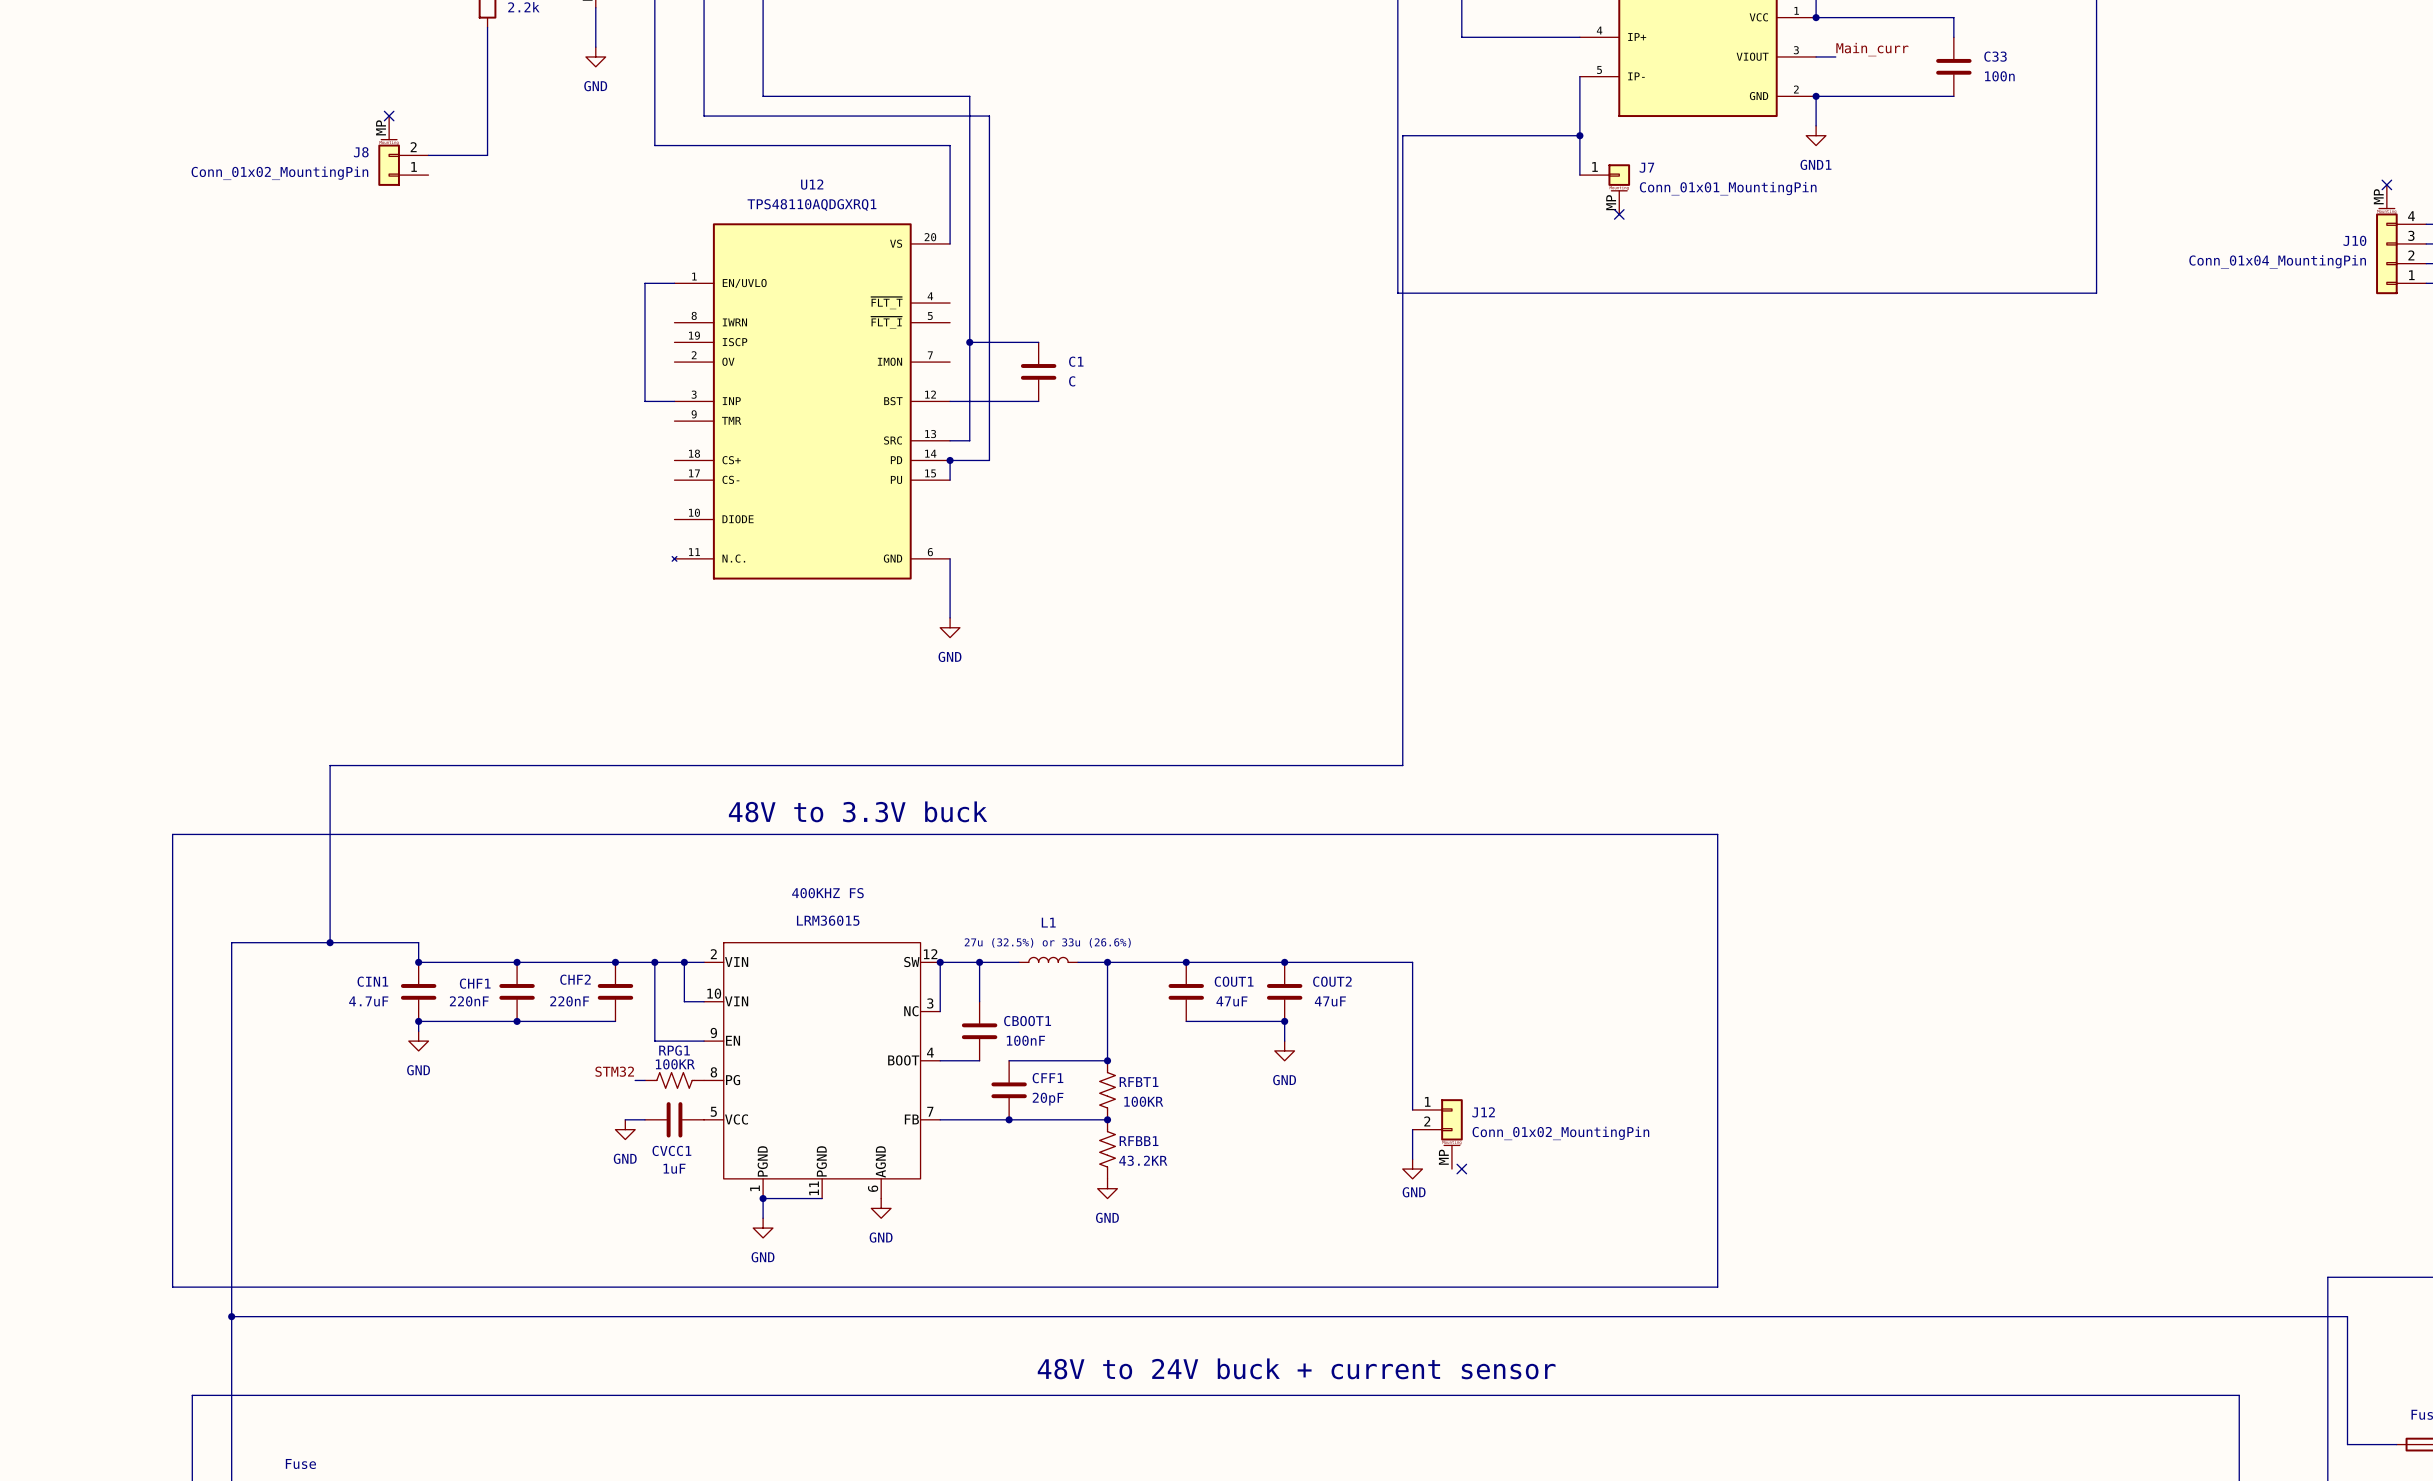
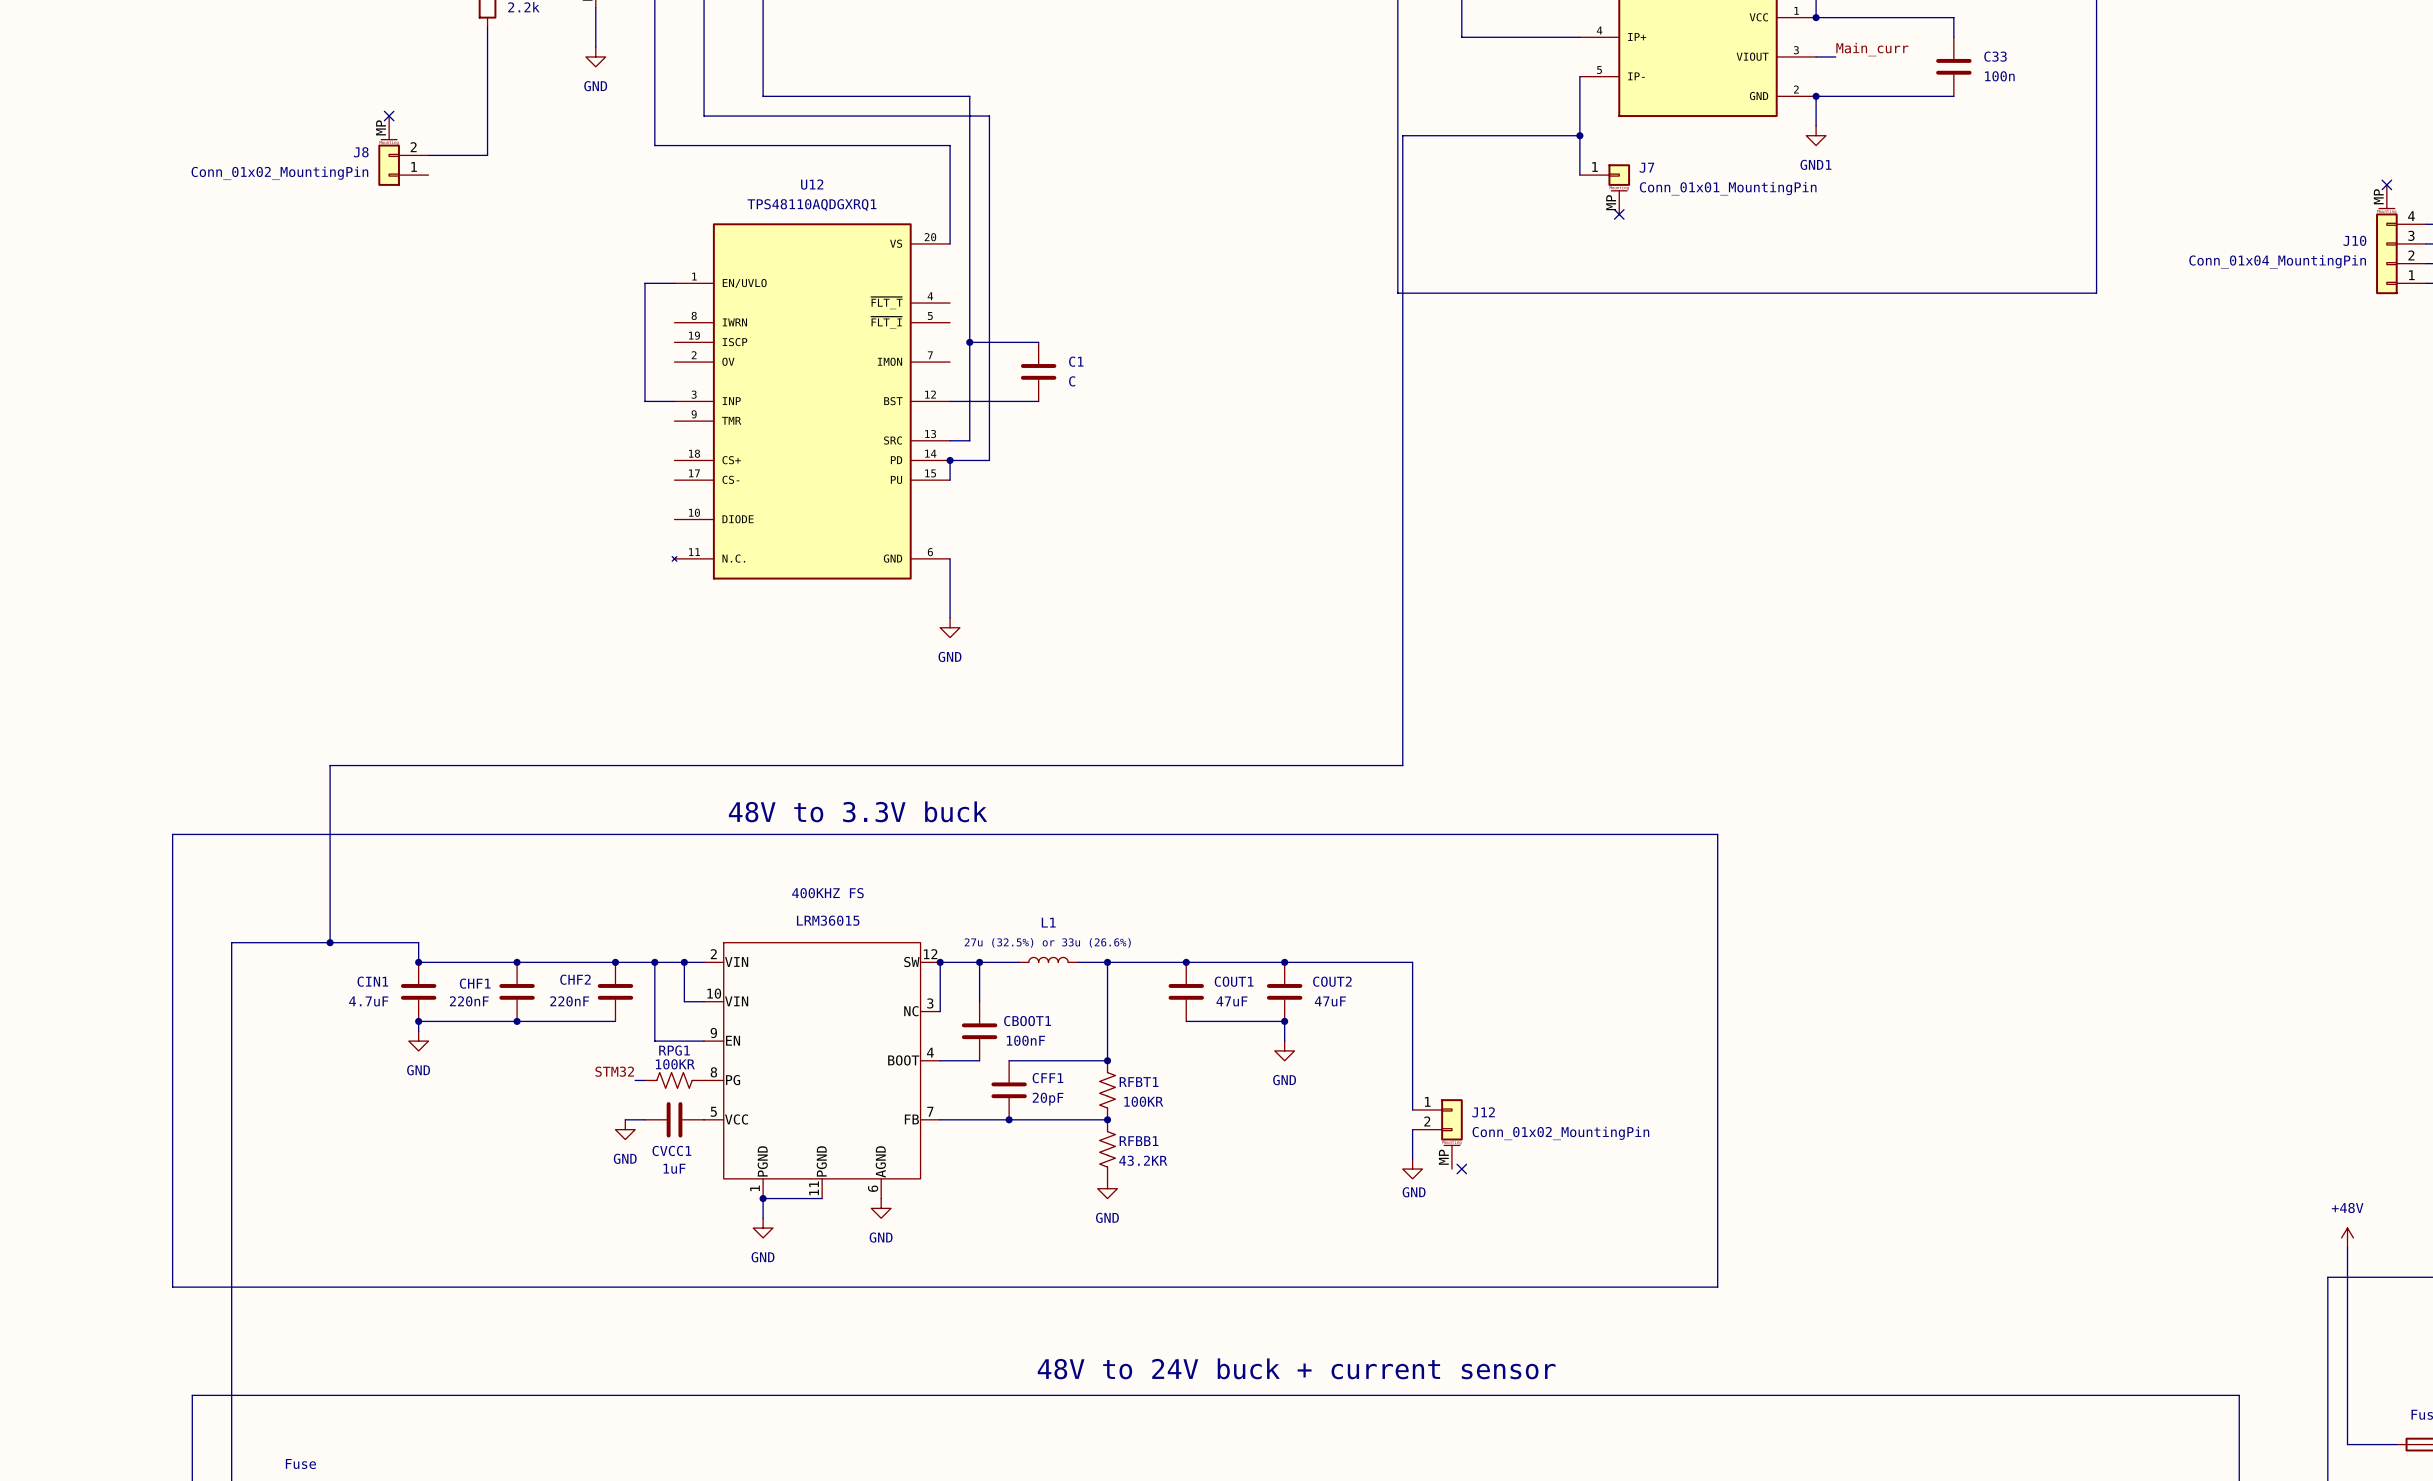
power symbol: none -> +48V (2347, 1237)
wire: (231, 1316) (2347, 1316) -> (2347, 1247) (2347, 1316)
junction: (231, 1316) -> none

